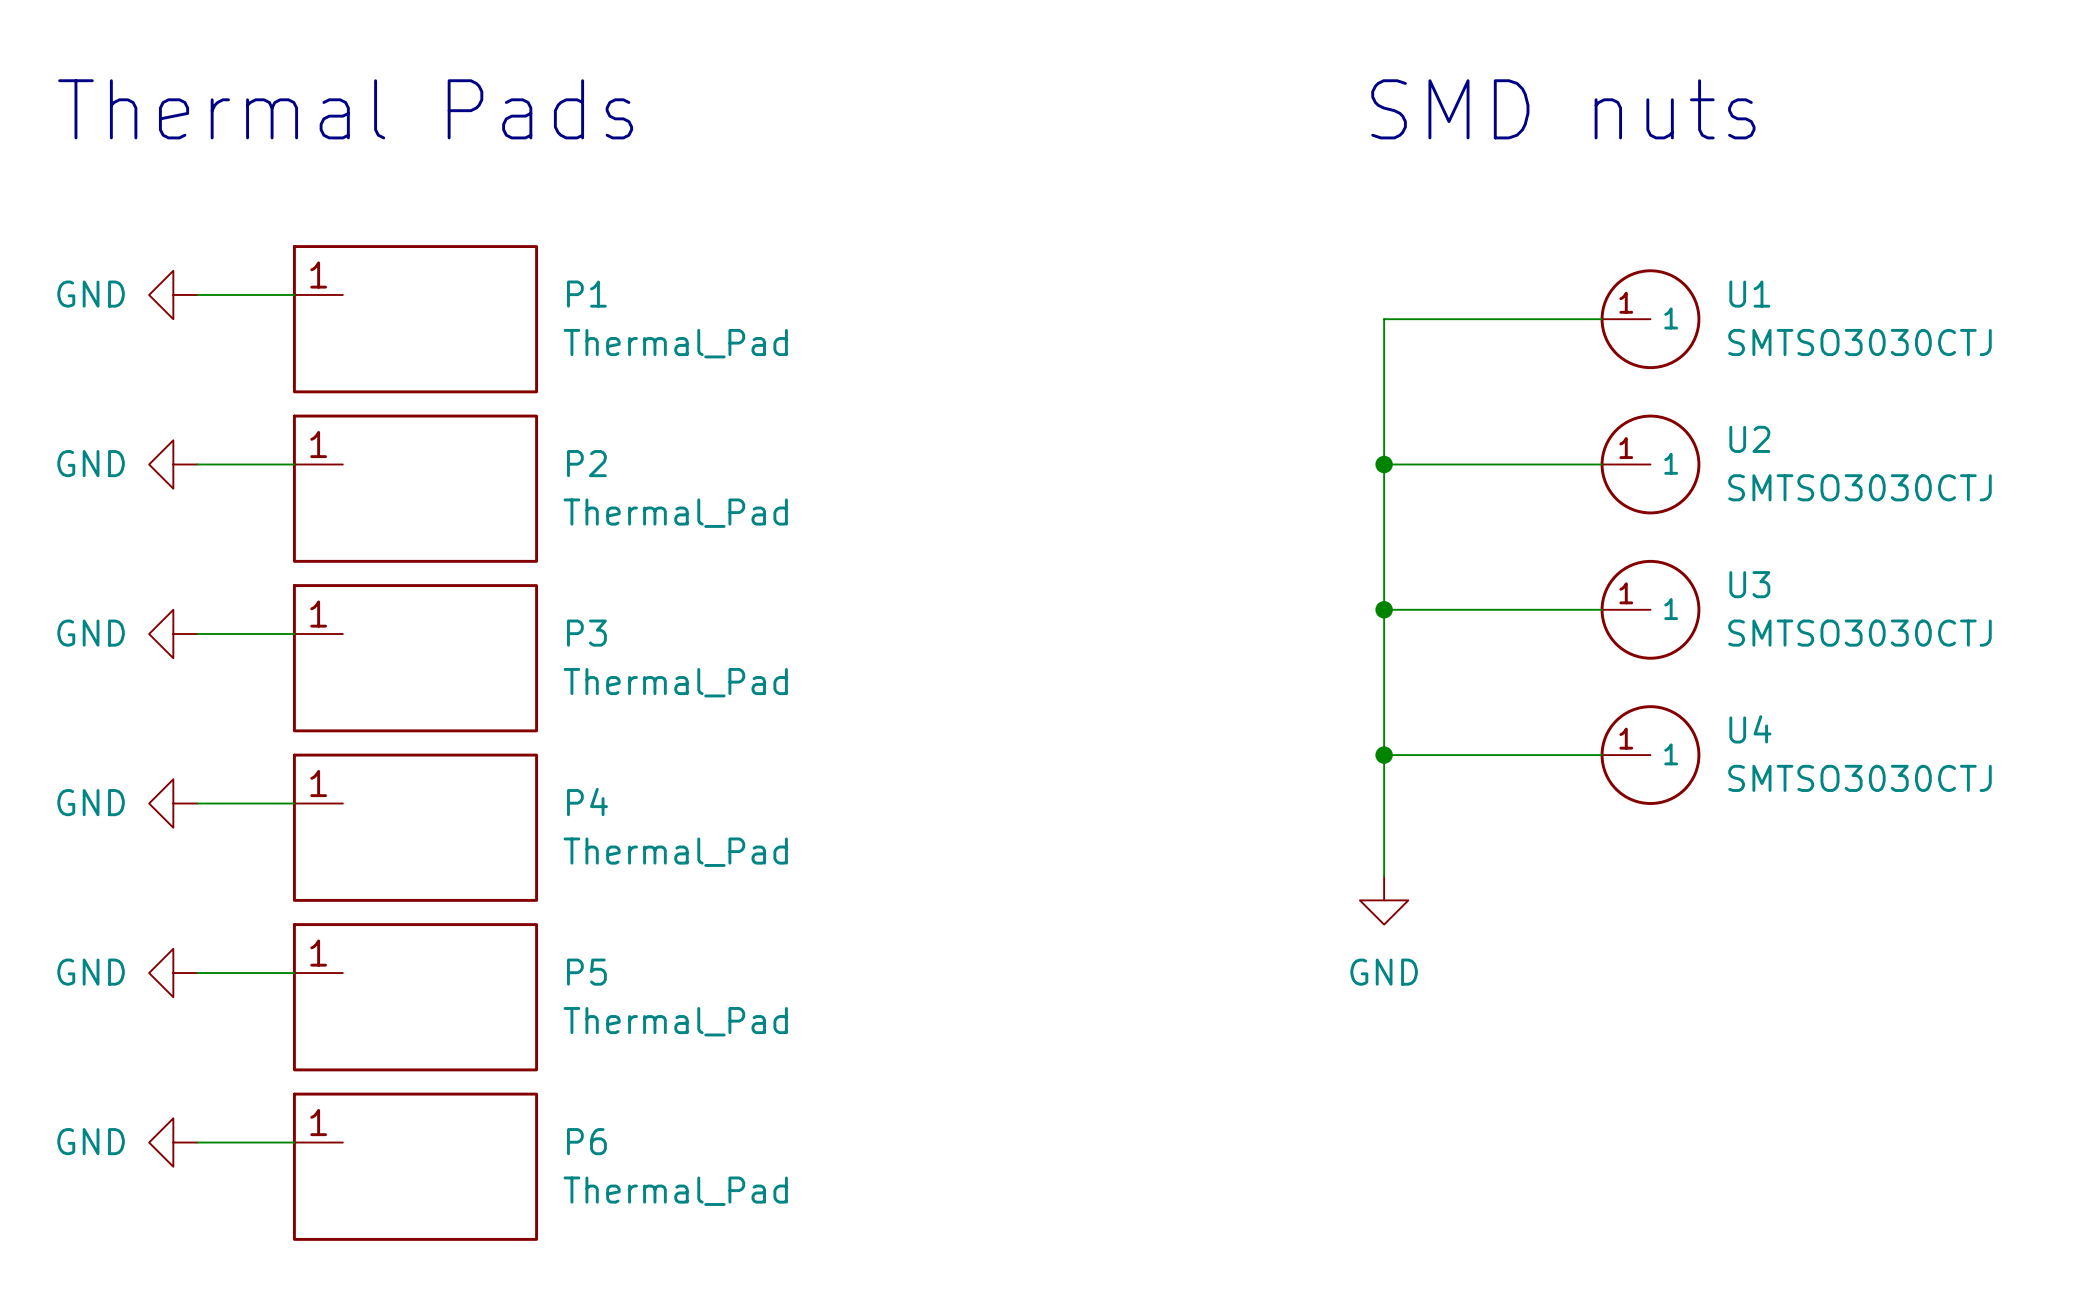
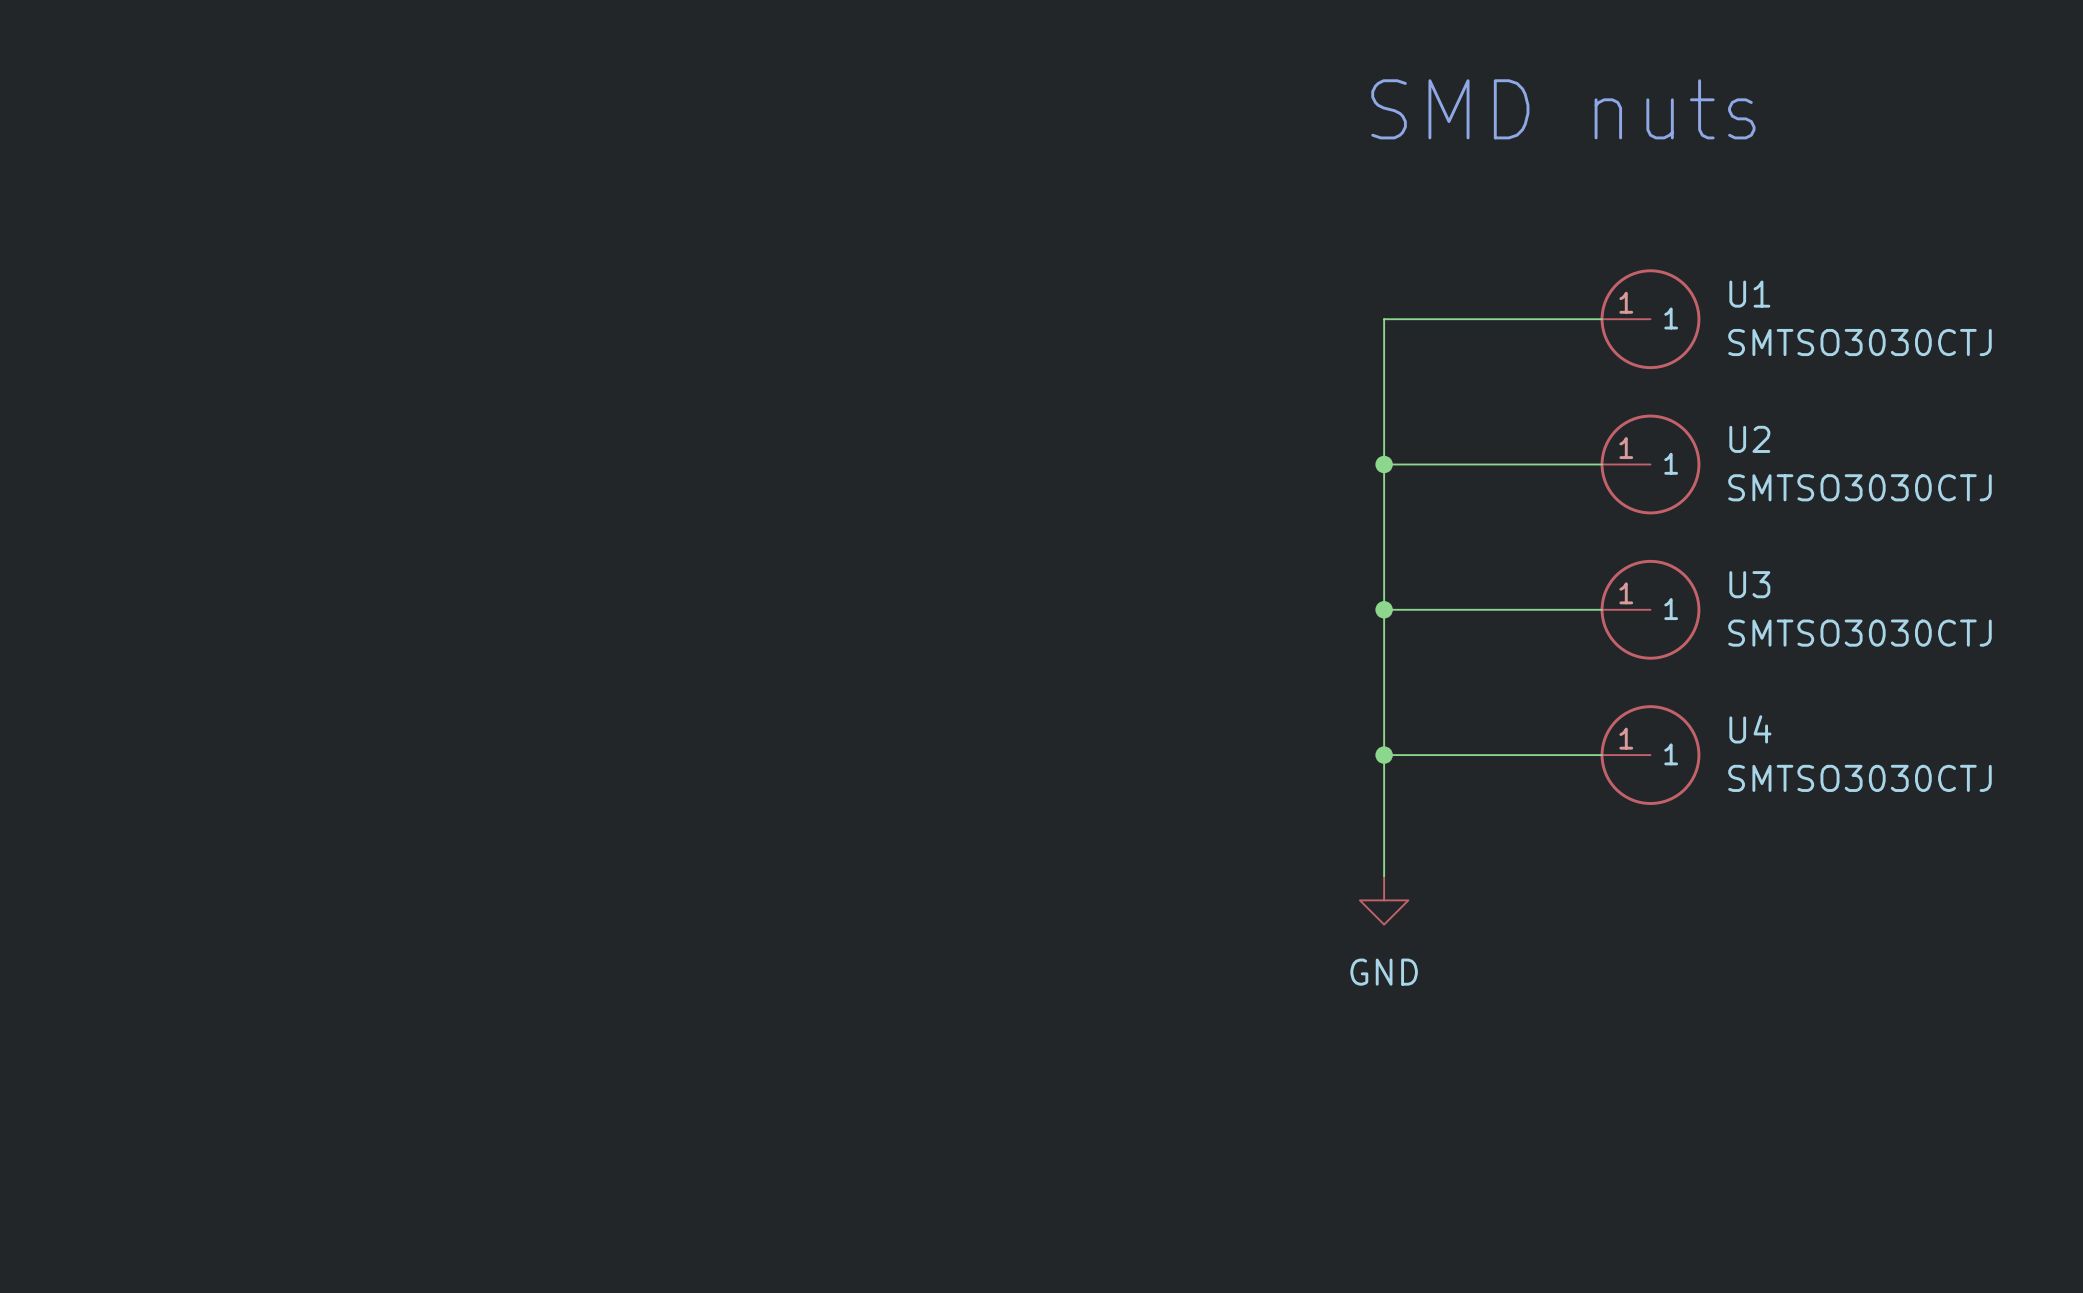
text: Thermal Pads (345, 109) -> none
power symbol: GND (173, 294) -> none
wire: (197, 294) (294, 294) -> none
P1: Thermal_Pad (415, 319) -> none
power symbol: GND (173, 464) -> none
wire: (197, 464) (294, 464) -> none
P2: Thermal_Pad (415, 488) -> none
power symbol: GND (173, 634) -> none
wire: (197, 634) (294, 634) -> none
P3: Thermal_Pad (415, 658) -> none
power symbol: GND (173, 803) -> none
wire: (197, 803) (294, 803) -> none
P4: Thermal_Pad (415, 827) -> none
power symbol: GND (173, 973) -> none
wire: (197, 973) (294, 973) -> none
P5: Thermal_Pad (415, 997) -> none
power symbol: GND (173, 1142) -> none
wire: (197, 1142) (294, 1142) -> none
P6: Thermal_Pad (415, 1166) -> none

